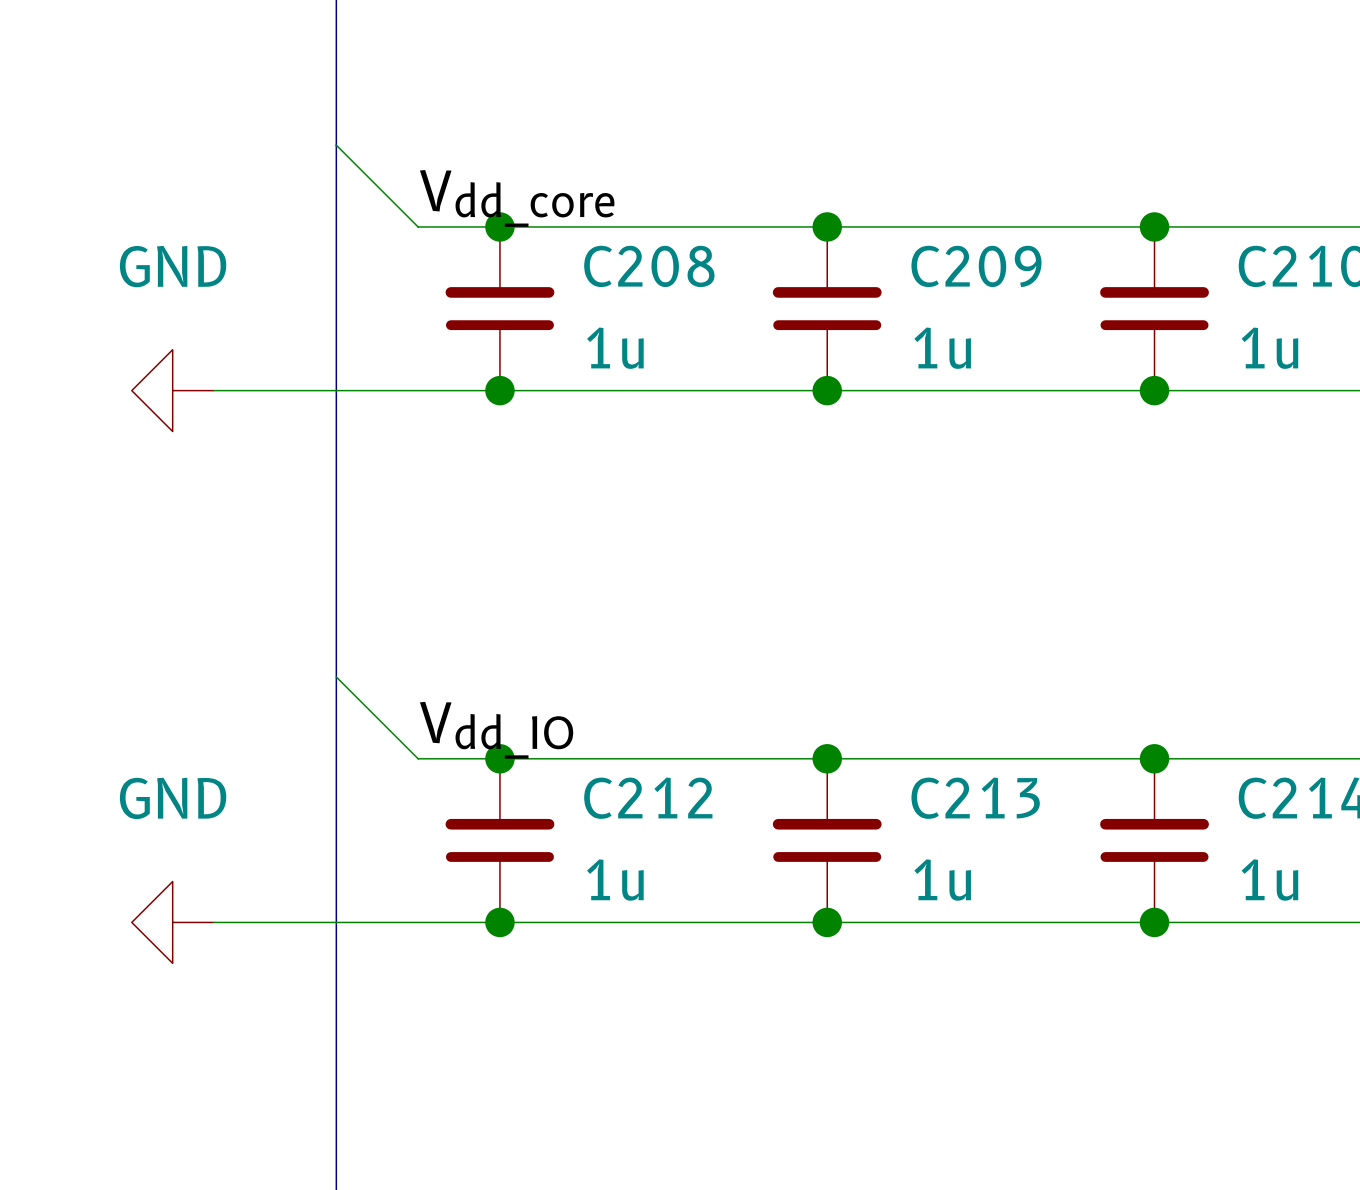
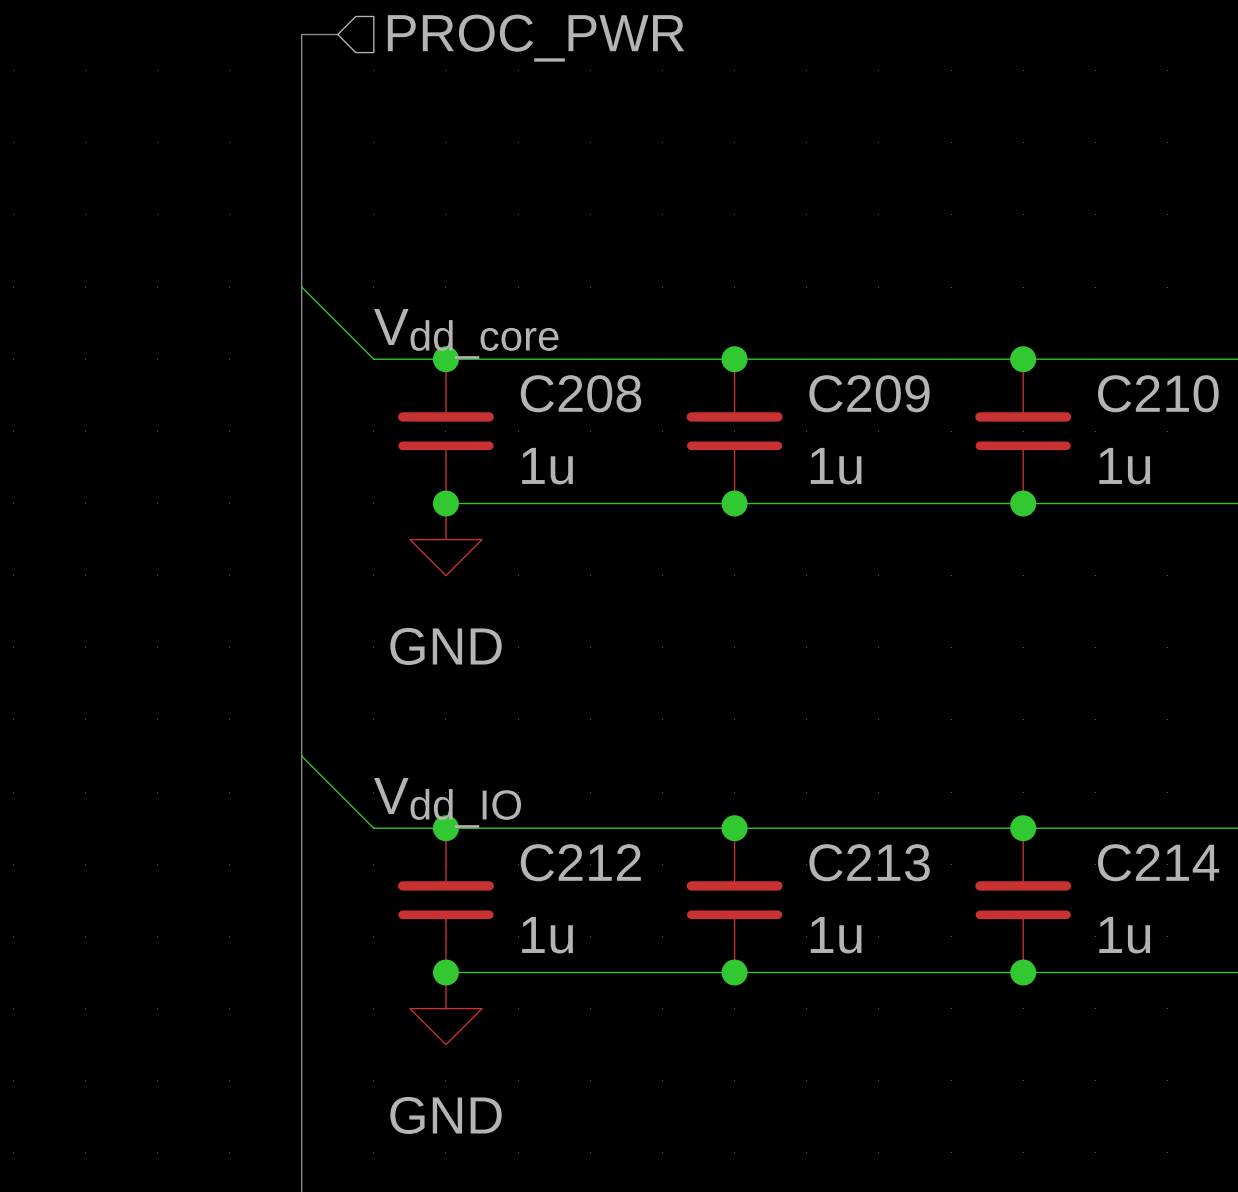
power symbol: GND (172, 390) -> none
wire: (213, 390) (499, 390) -> none
power symbol: none -> GND (445, 539)
power symbol: GND (172, 922) -> none
wire: (213, 922) (499, 922) -> none
power symbol: none -> GND (445, 1008)

